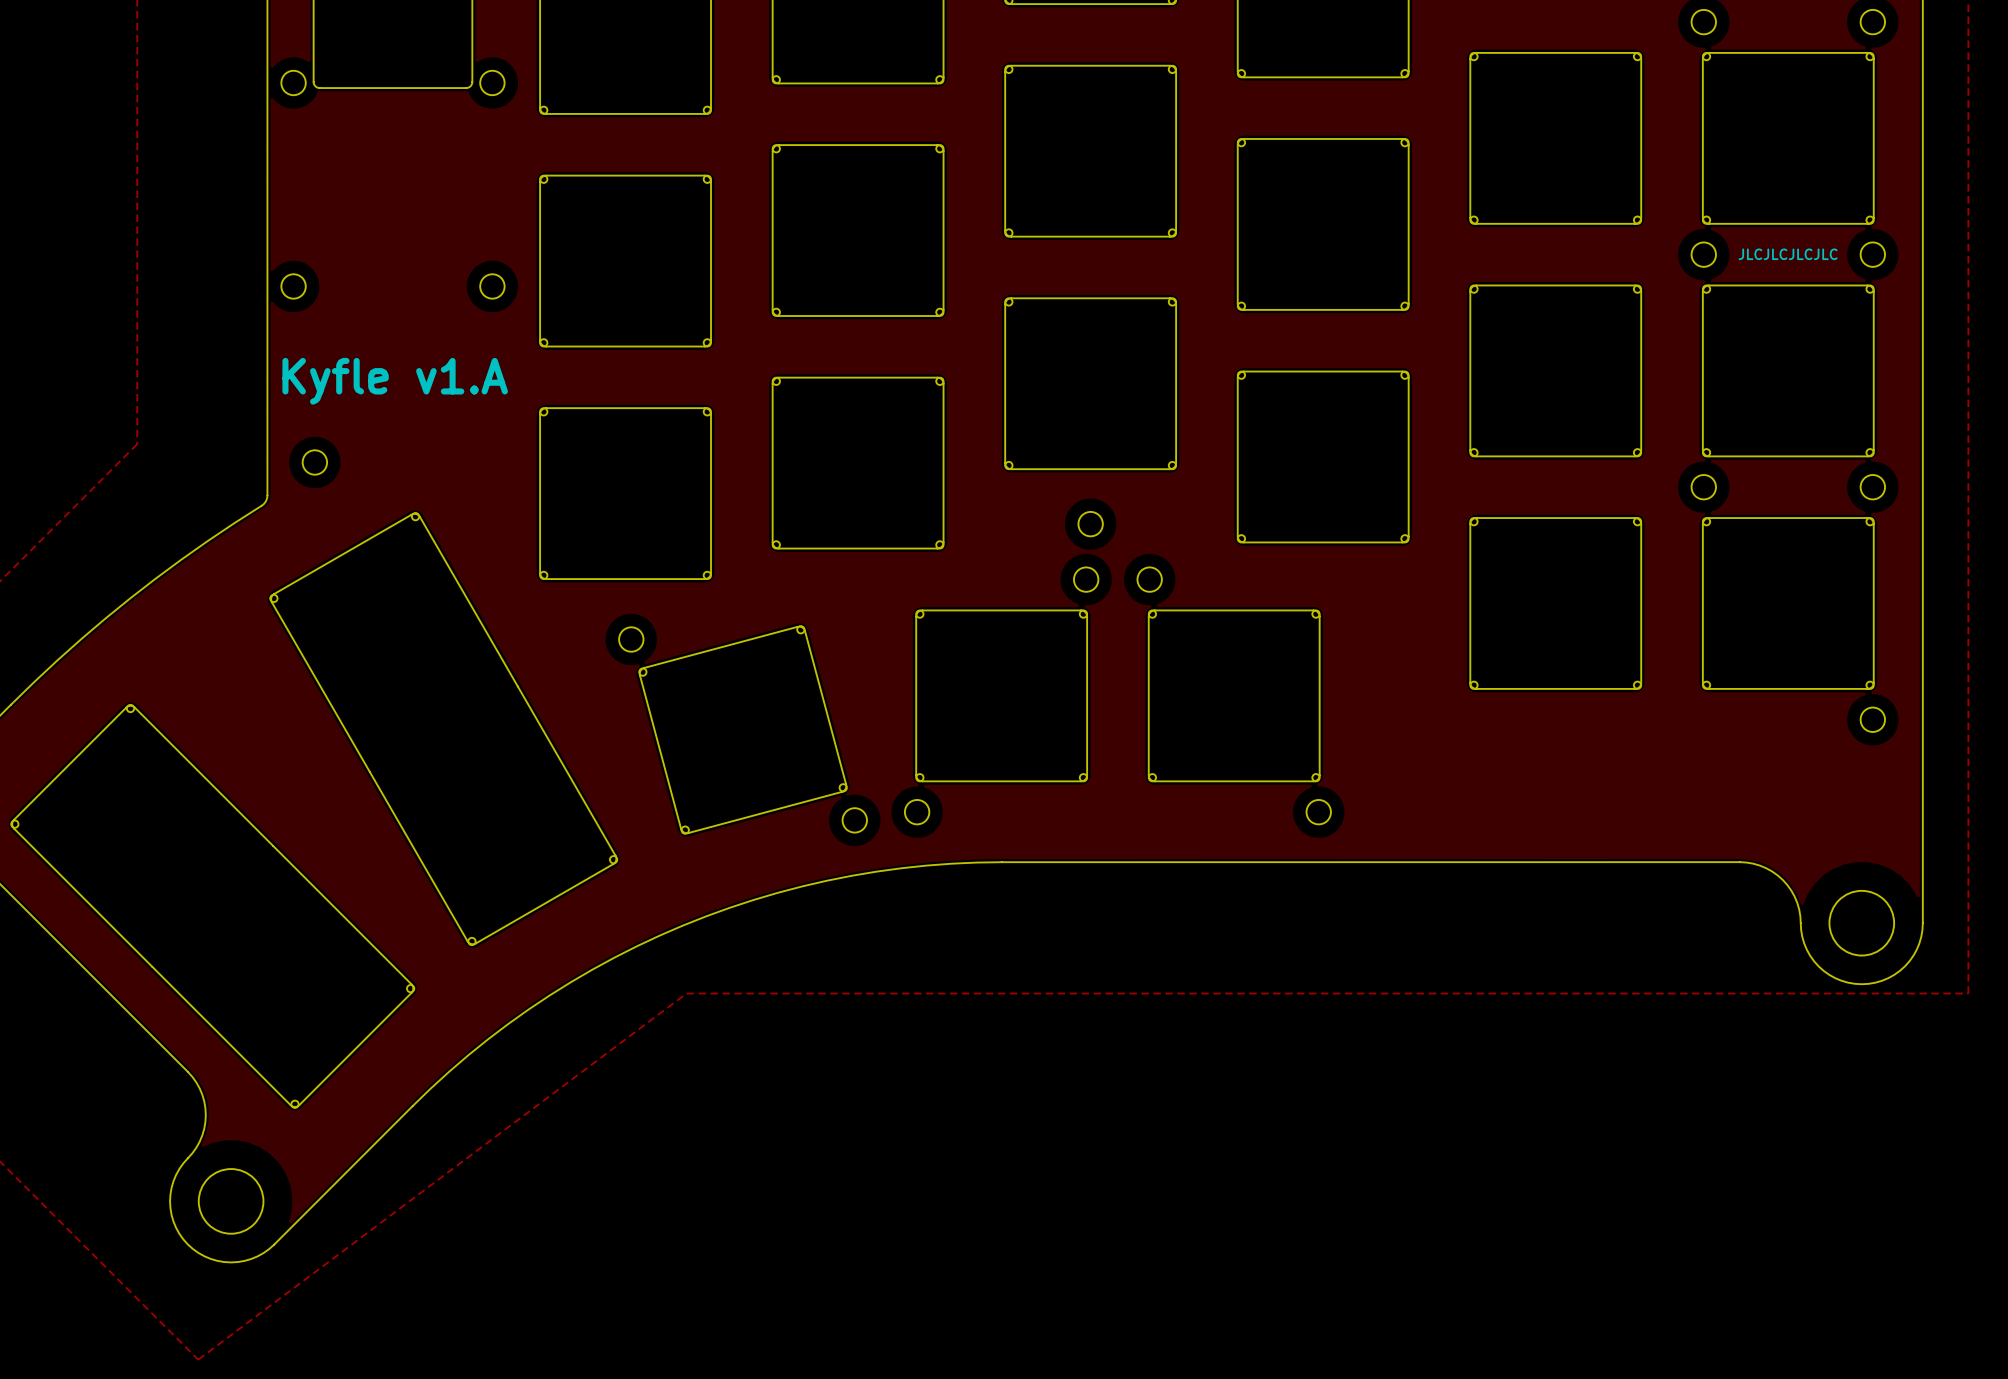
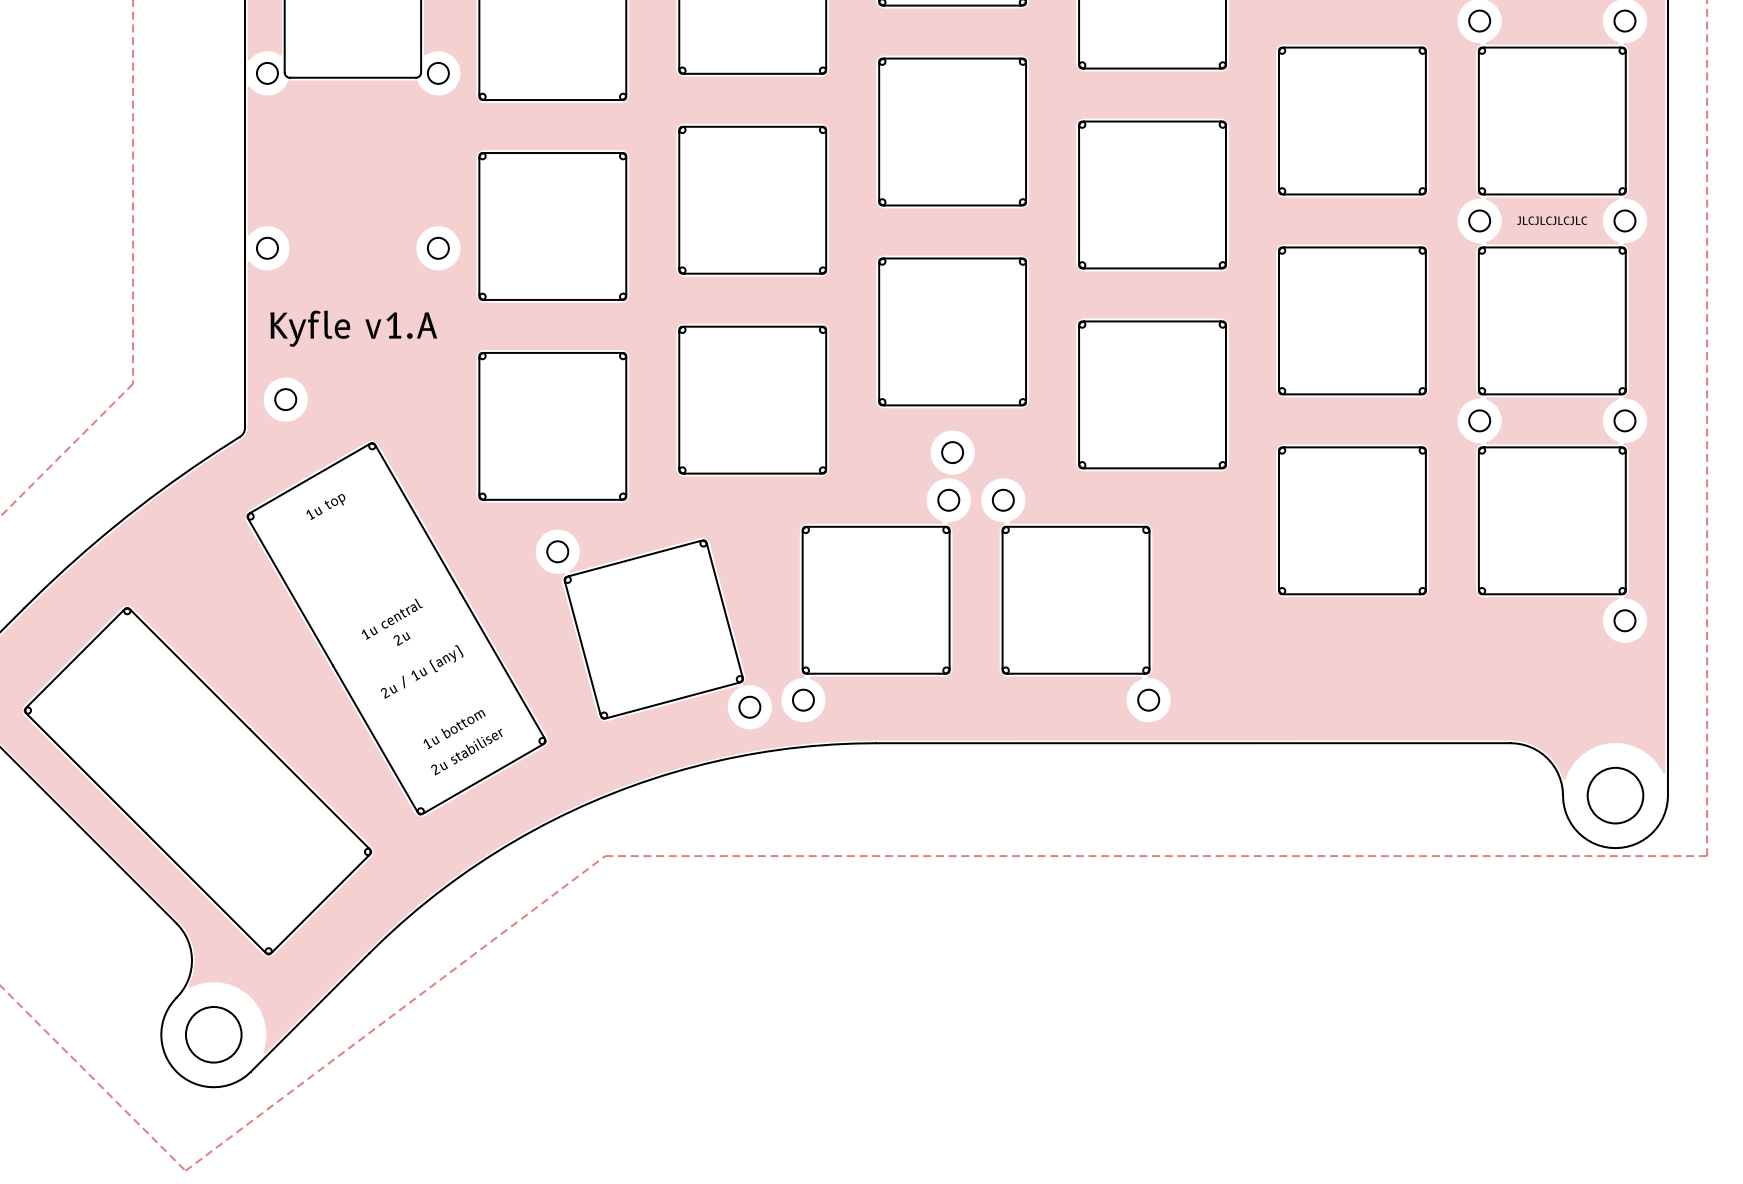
part text: none -> 1u top (325, 507)
part text: none -> 1u central (392, 619)
part text: none -> 2u (402, 639)
part text: none -> 2u / 1u (any) (422, 672)
part text: none -> 1u bottom (454, 729)
part text: none -> 2u stabiliser (466, 752)

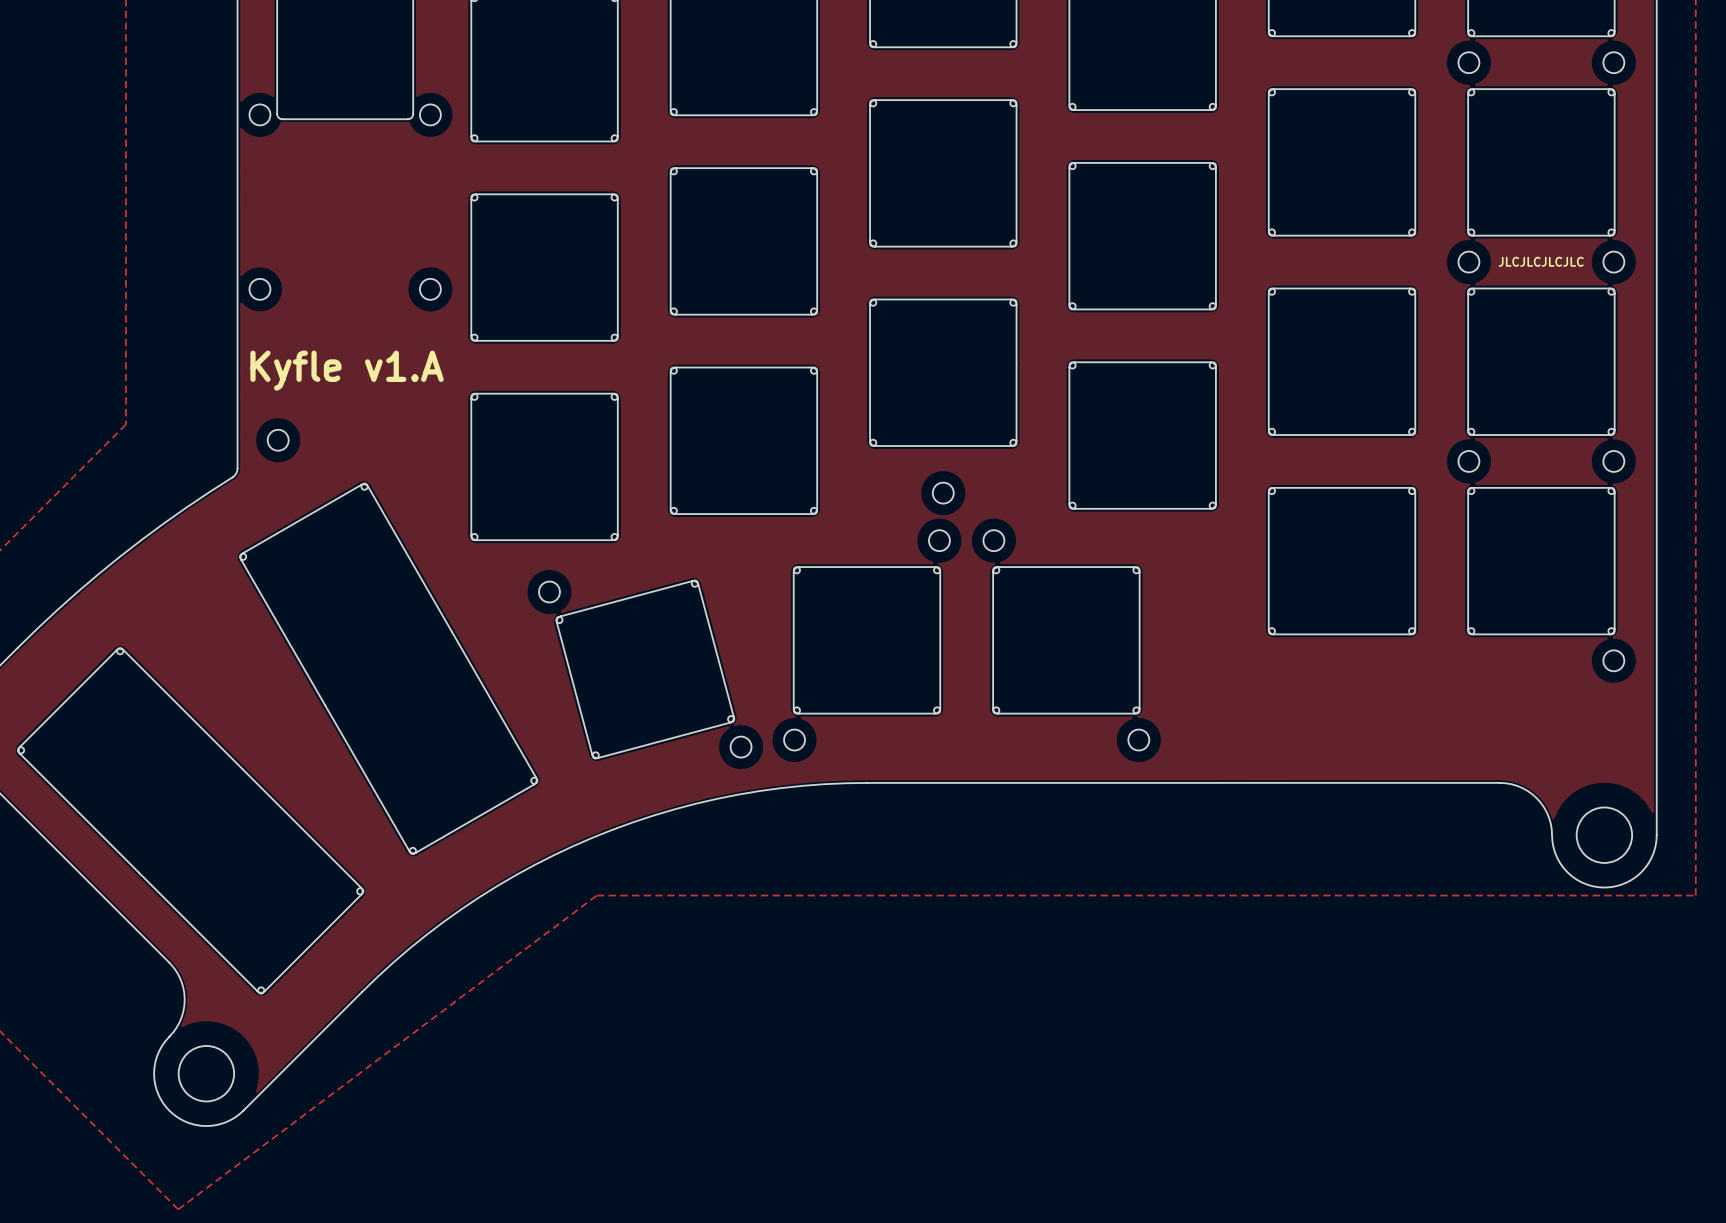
part text: 1u top (325, 507) -> none
part text: 1u central (392, 619) -> none
part text: 2u (402, 639) -> none
part text: 2u / 1u (any) (422, 672) -> none
part text: 1u bottom (454, 729) -> none
part text: 2u stabiliser (466, 752) -> none

